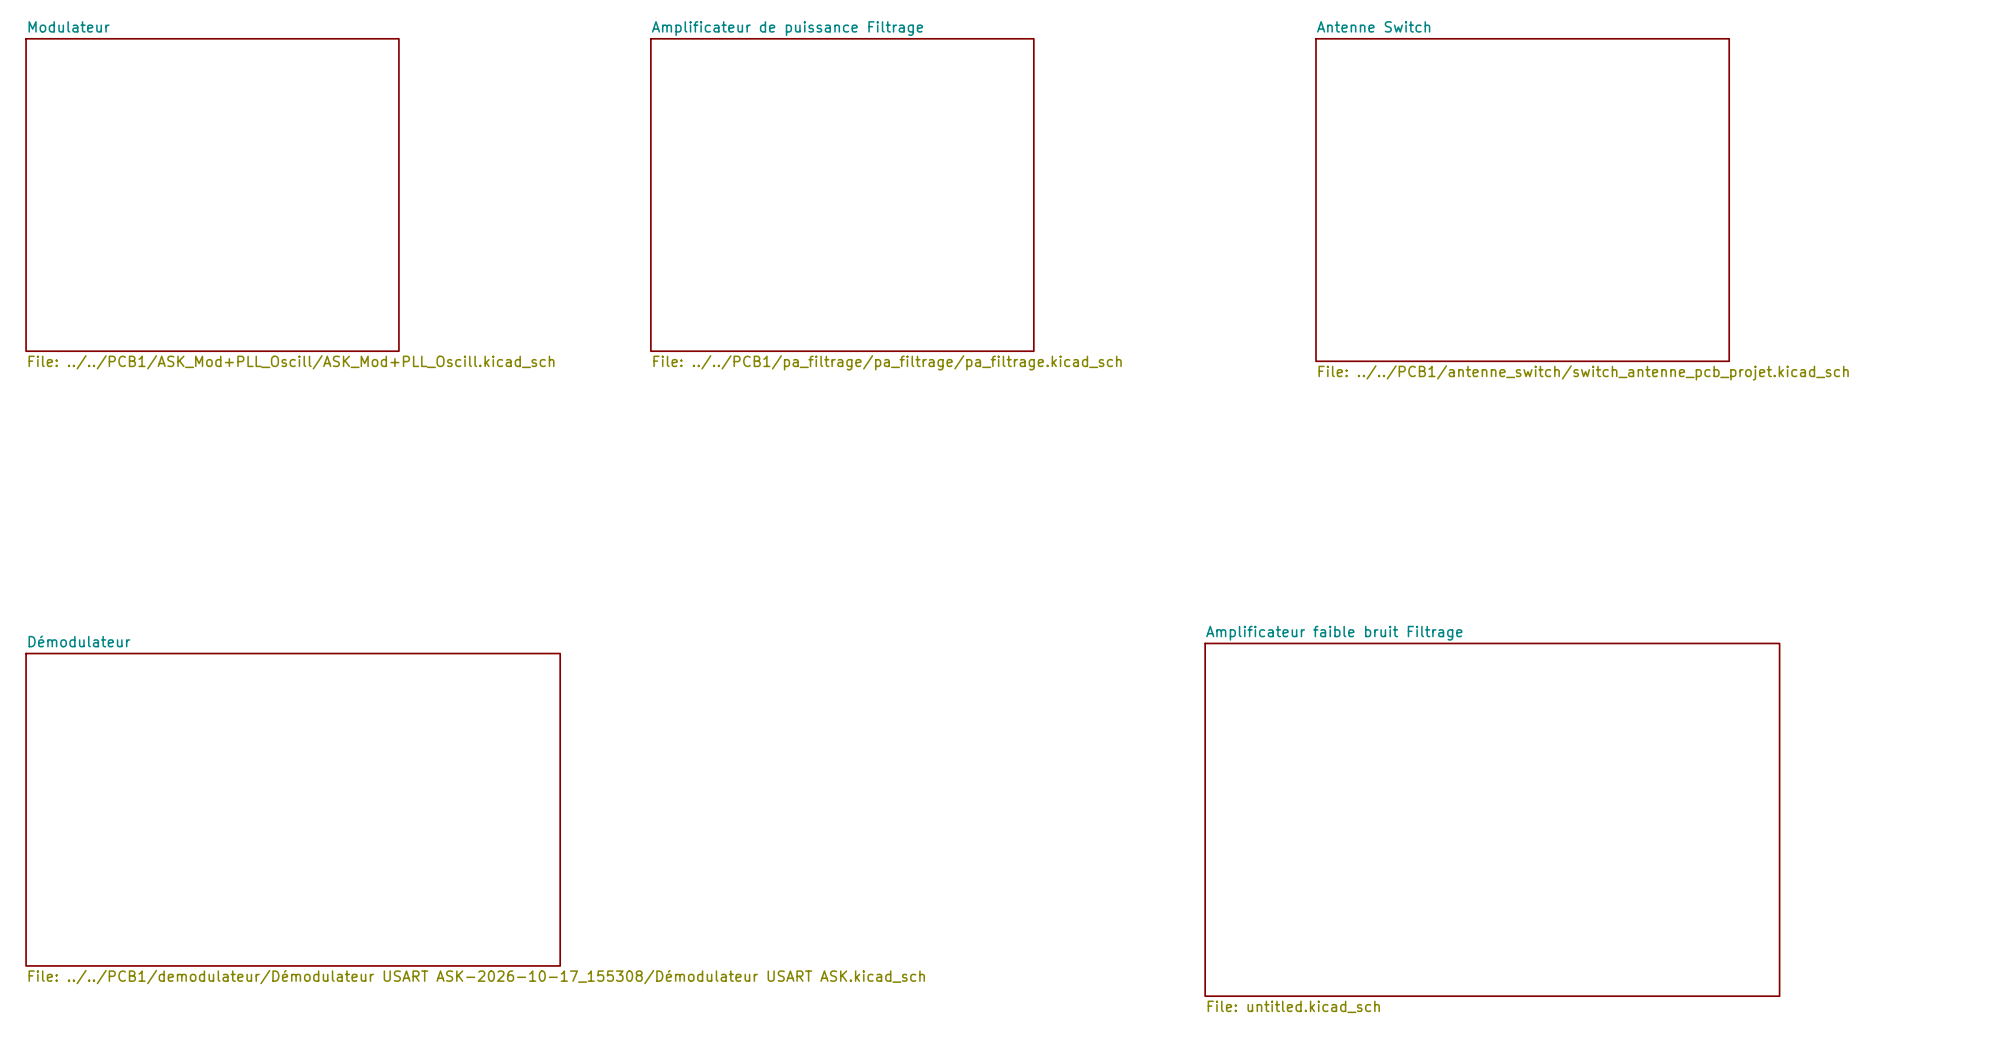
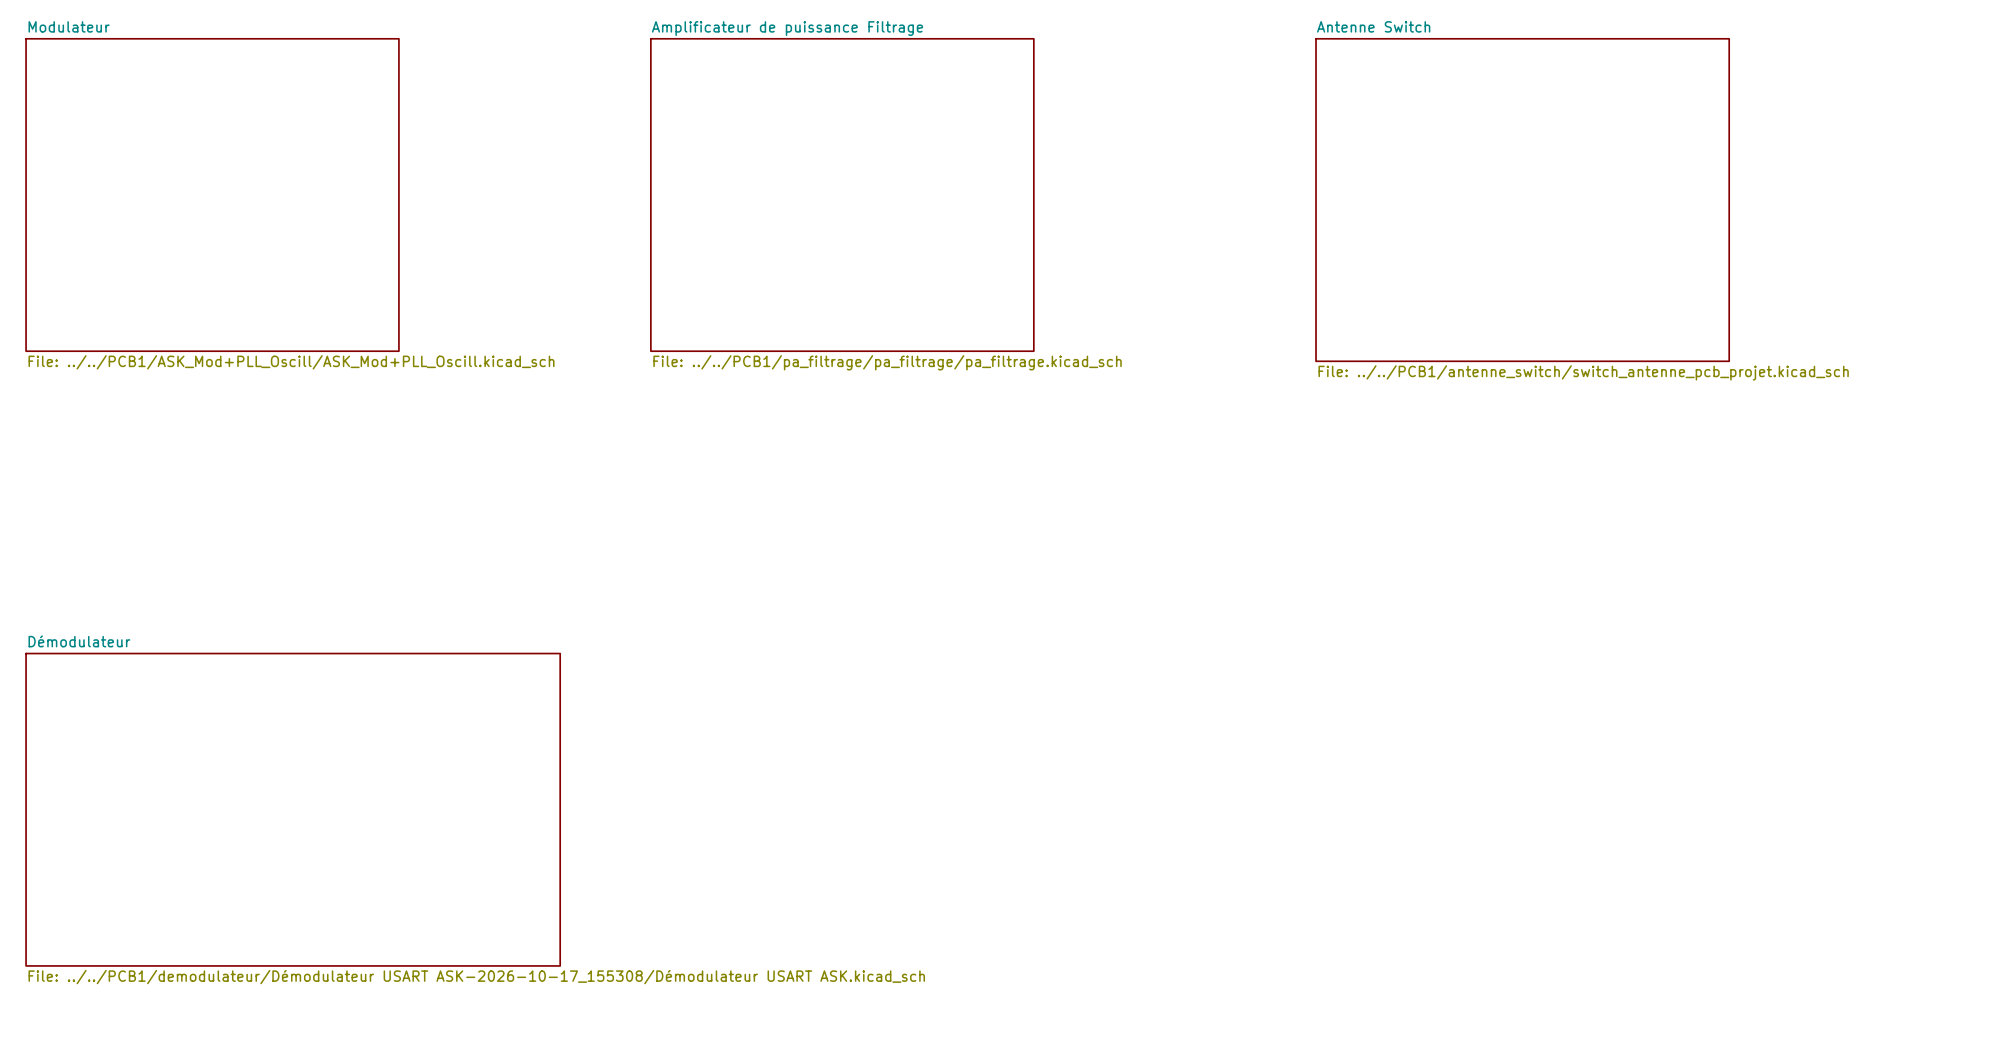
sheet Amplificateur faible bruit Filtrage: File: untitled.kicad_sch (1492, 819) -> none

